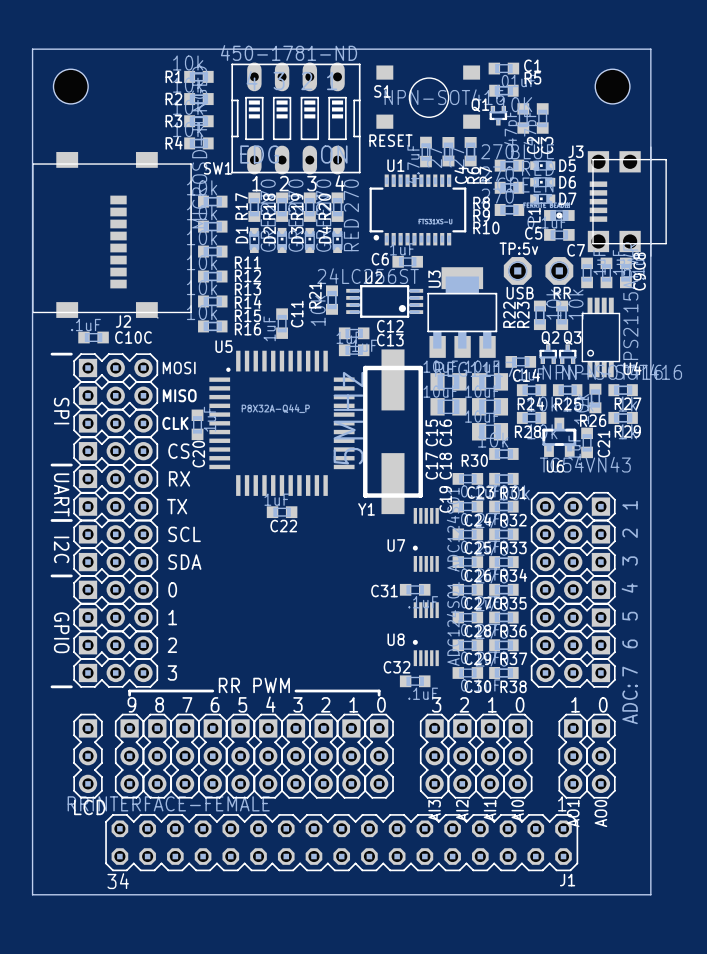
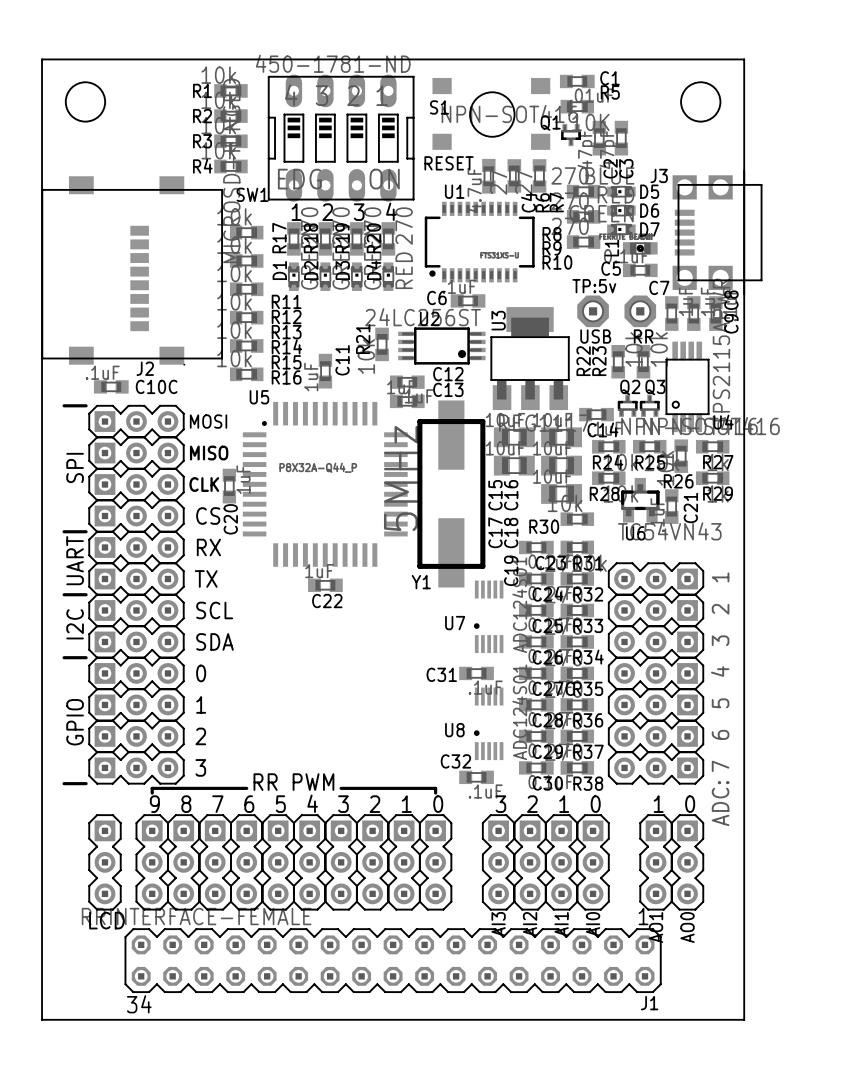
text rotation: 0° (61, 411) -> 180° (75, 467)
text rotation: 0° (61, 495) -> 180° (75, 560)
text rotation: 0° (61, 549) -> 180° (75, 624)
text rotation: 0° (61, 632) -> 180° (75, 722)

